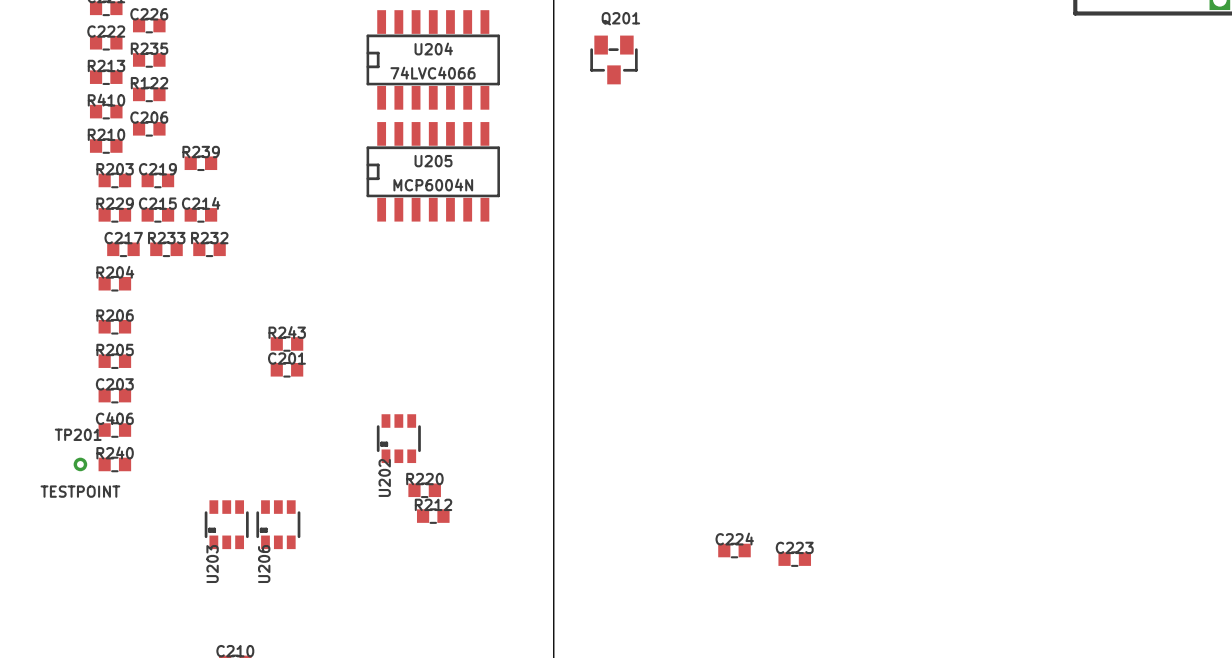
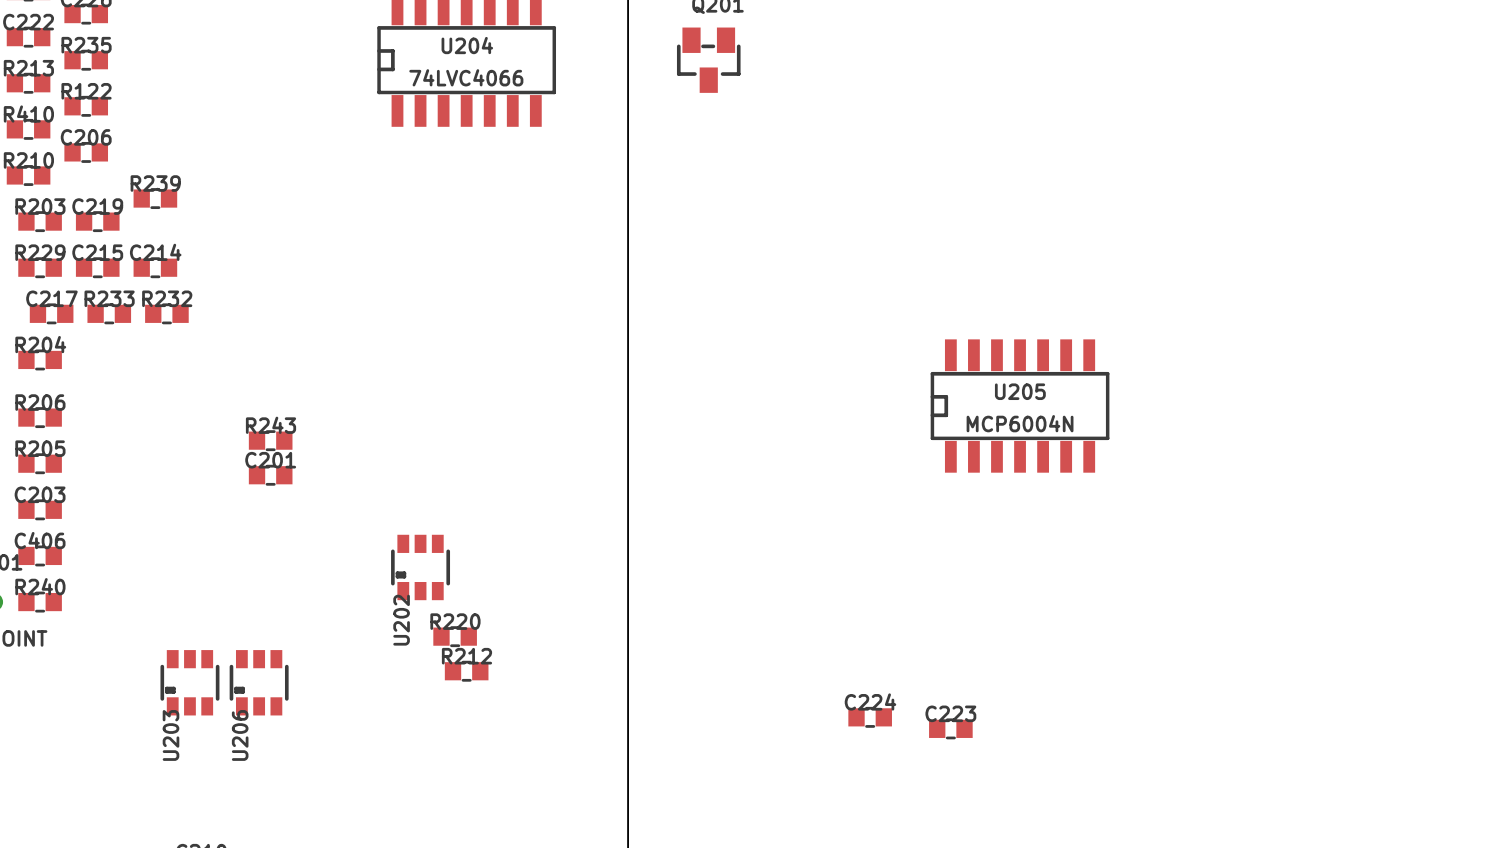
U205 position: (433, 171) -> (1020, 406)

